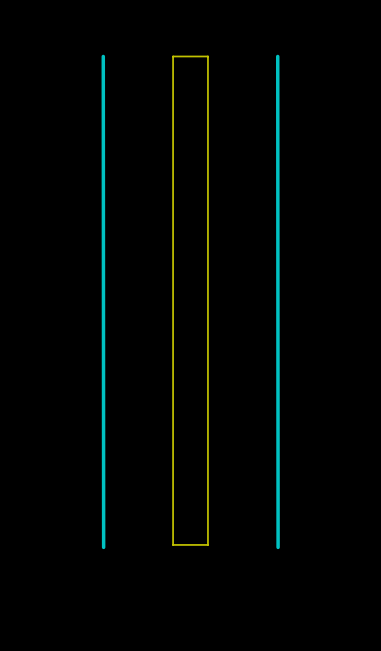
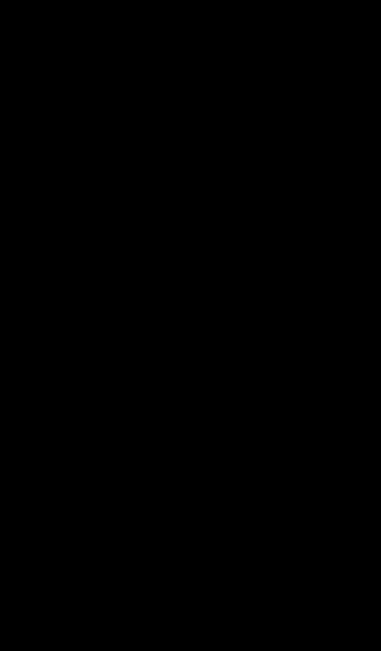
line: (103, 56) (103, 547) -> none
board edge: (173, 56) (207, 56) (207, 544) (173, 544) (173, 56) -> none
line: (277, 56) (278, 547) -> none

